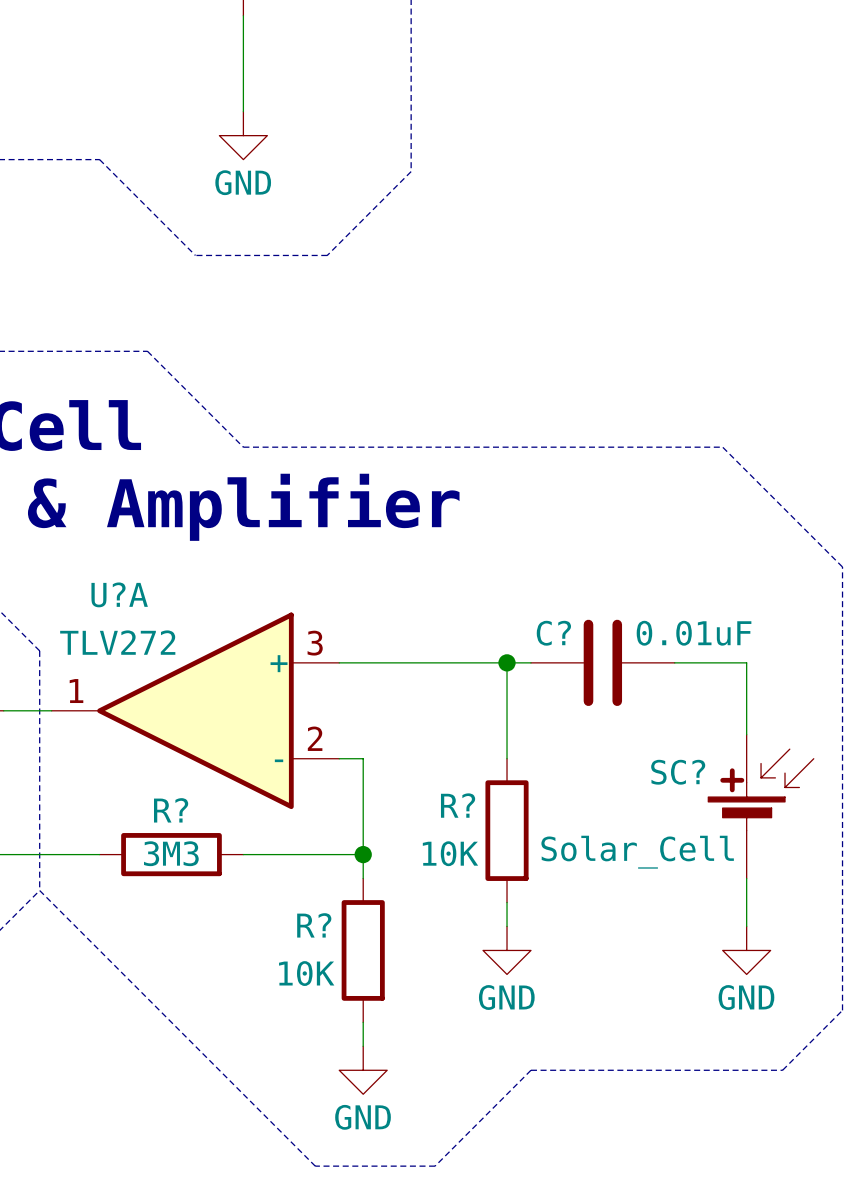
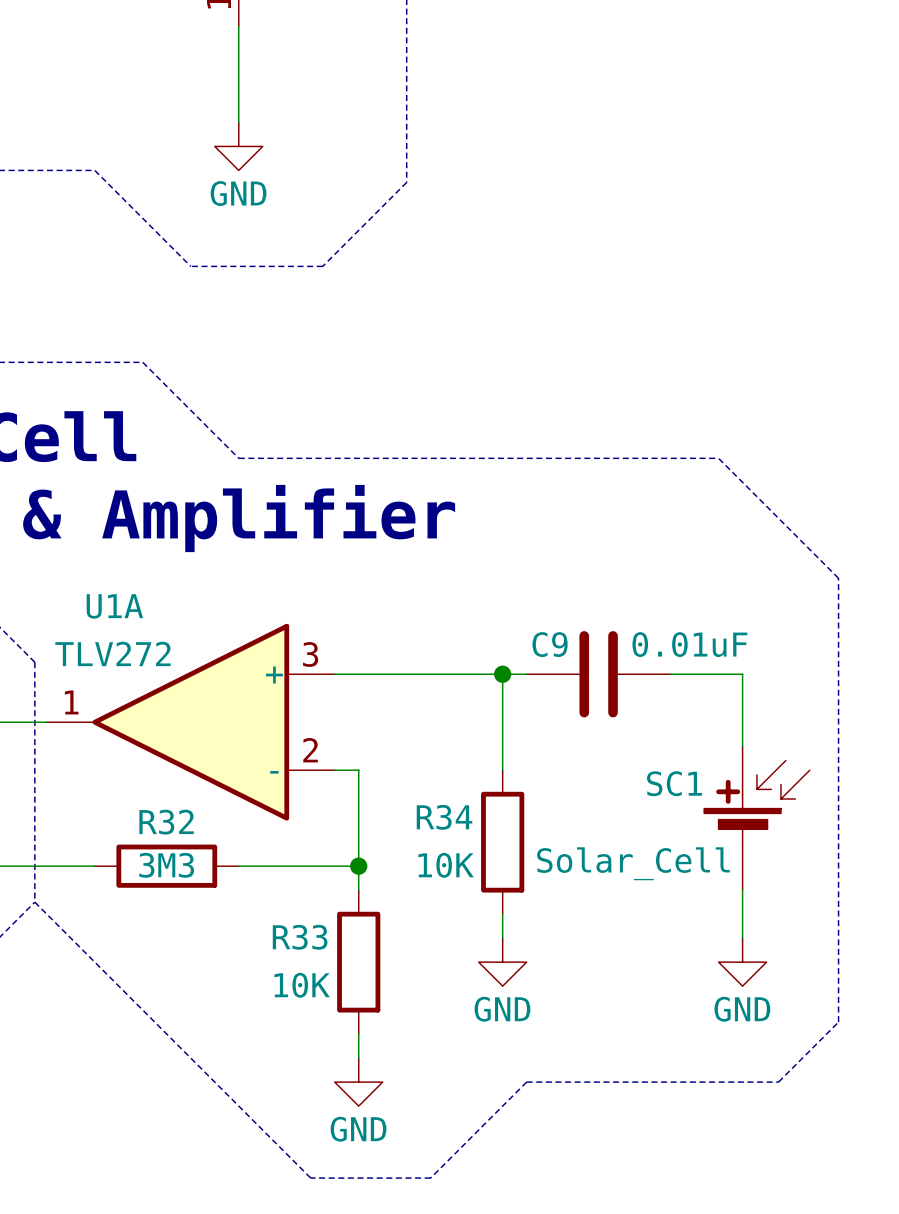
U?A name: U?A (119, 594) -> U1A (114, 606)
C? name: C? (553, 633) -> C9 (550, 644)
SC? name: SC? (678, 772) -> SC1 (674, 783)
R? name: R? (458, 805) -> R34 (444, 817)
R? name: R? (171, 810) -> R32 (166, 822)
R? name: R? (314, 925) -> R33 (300, 937)

